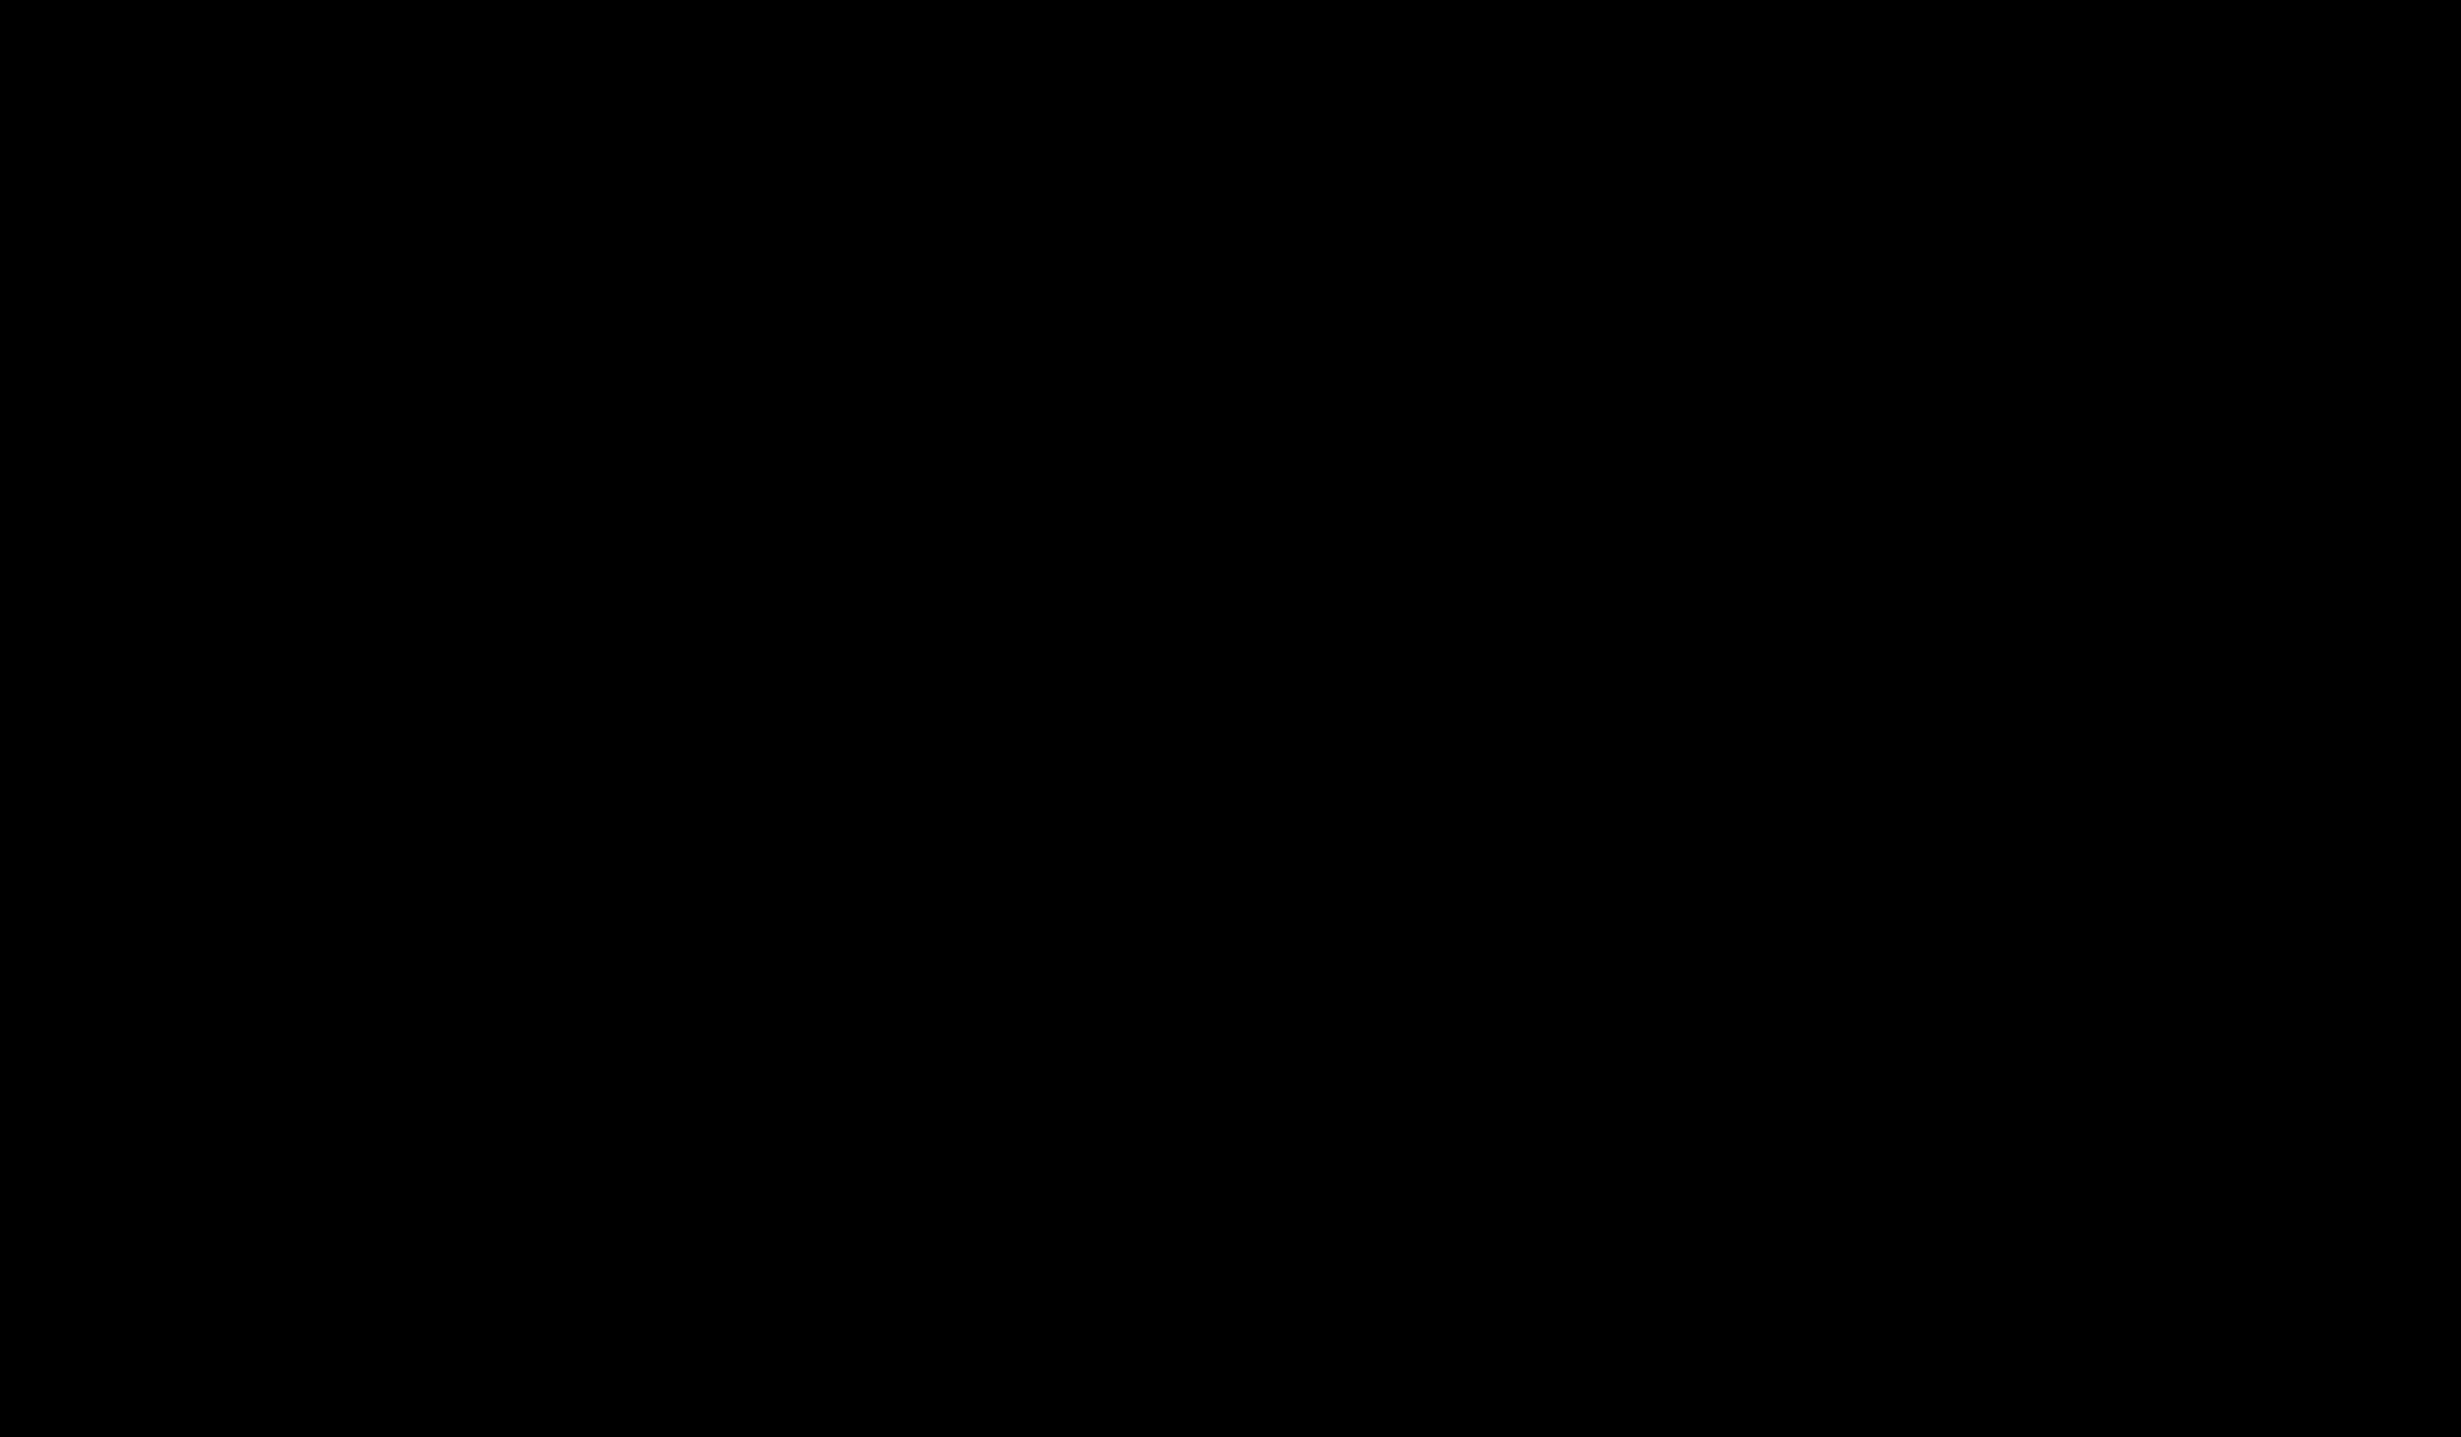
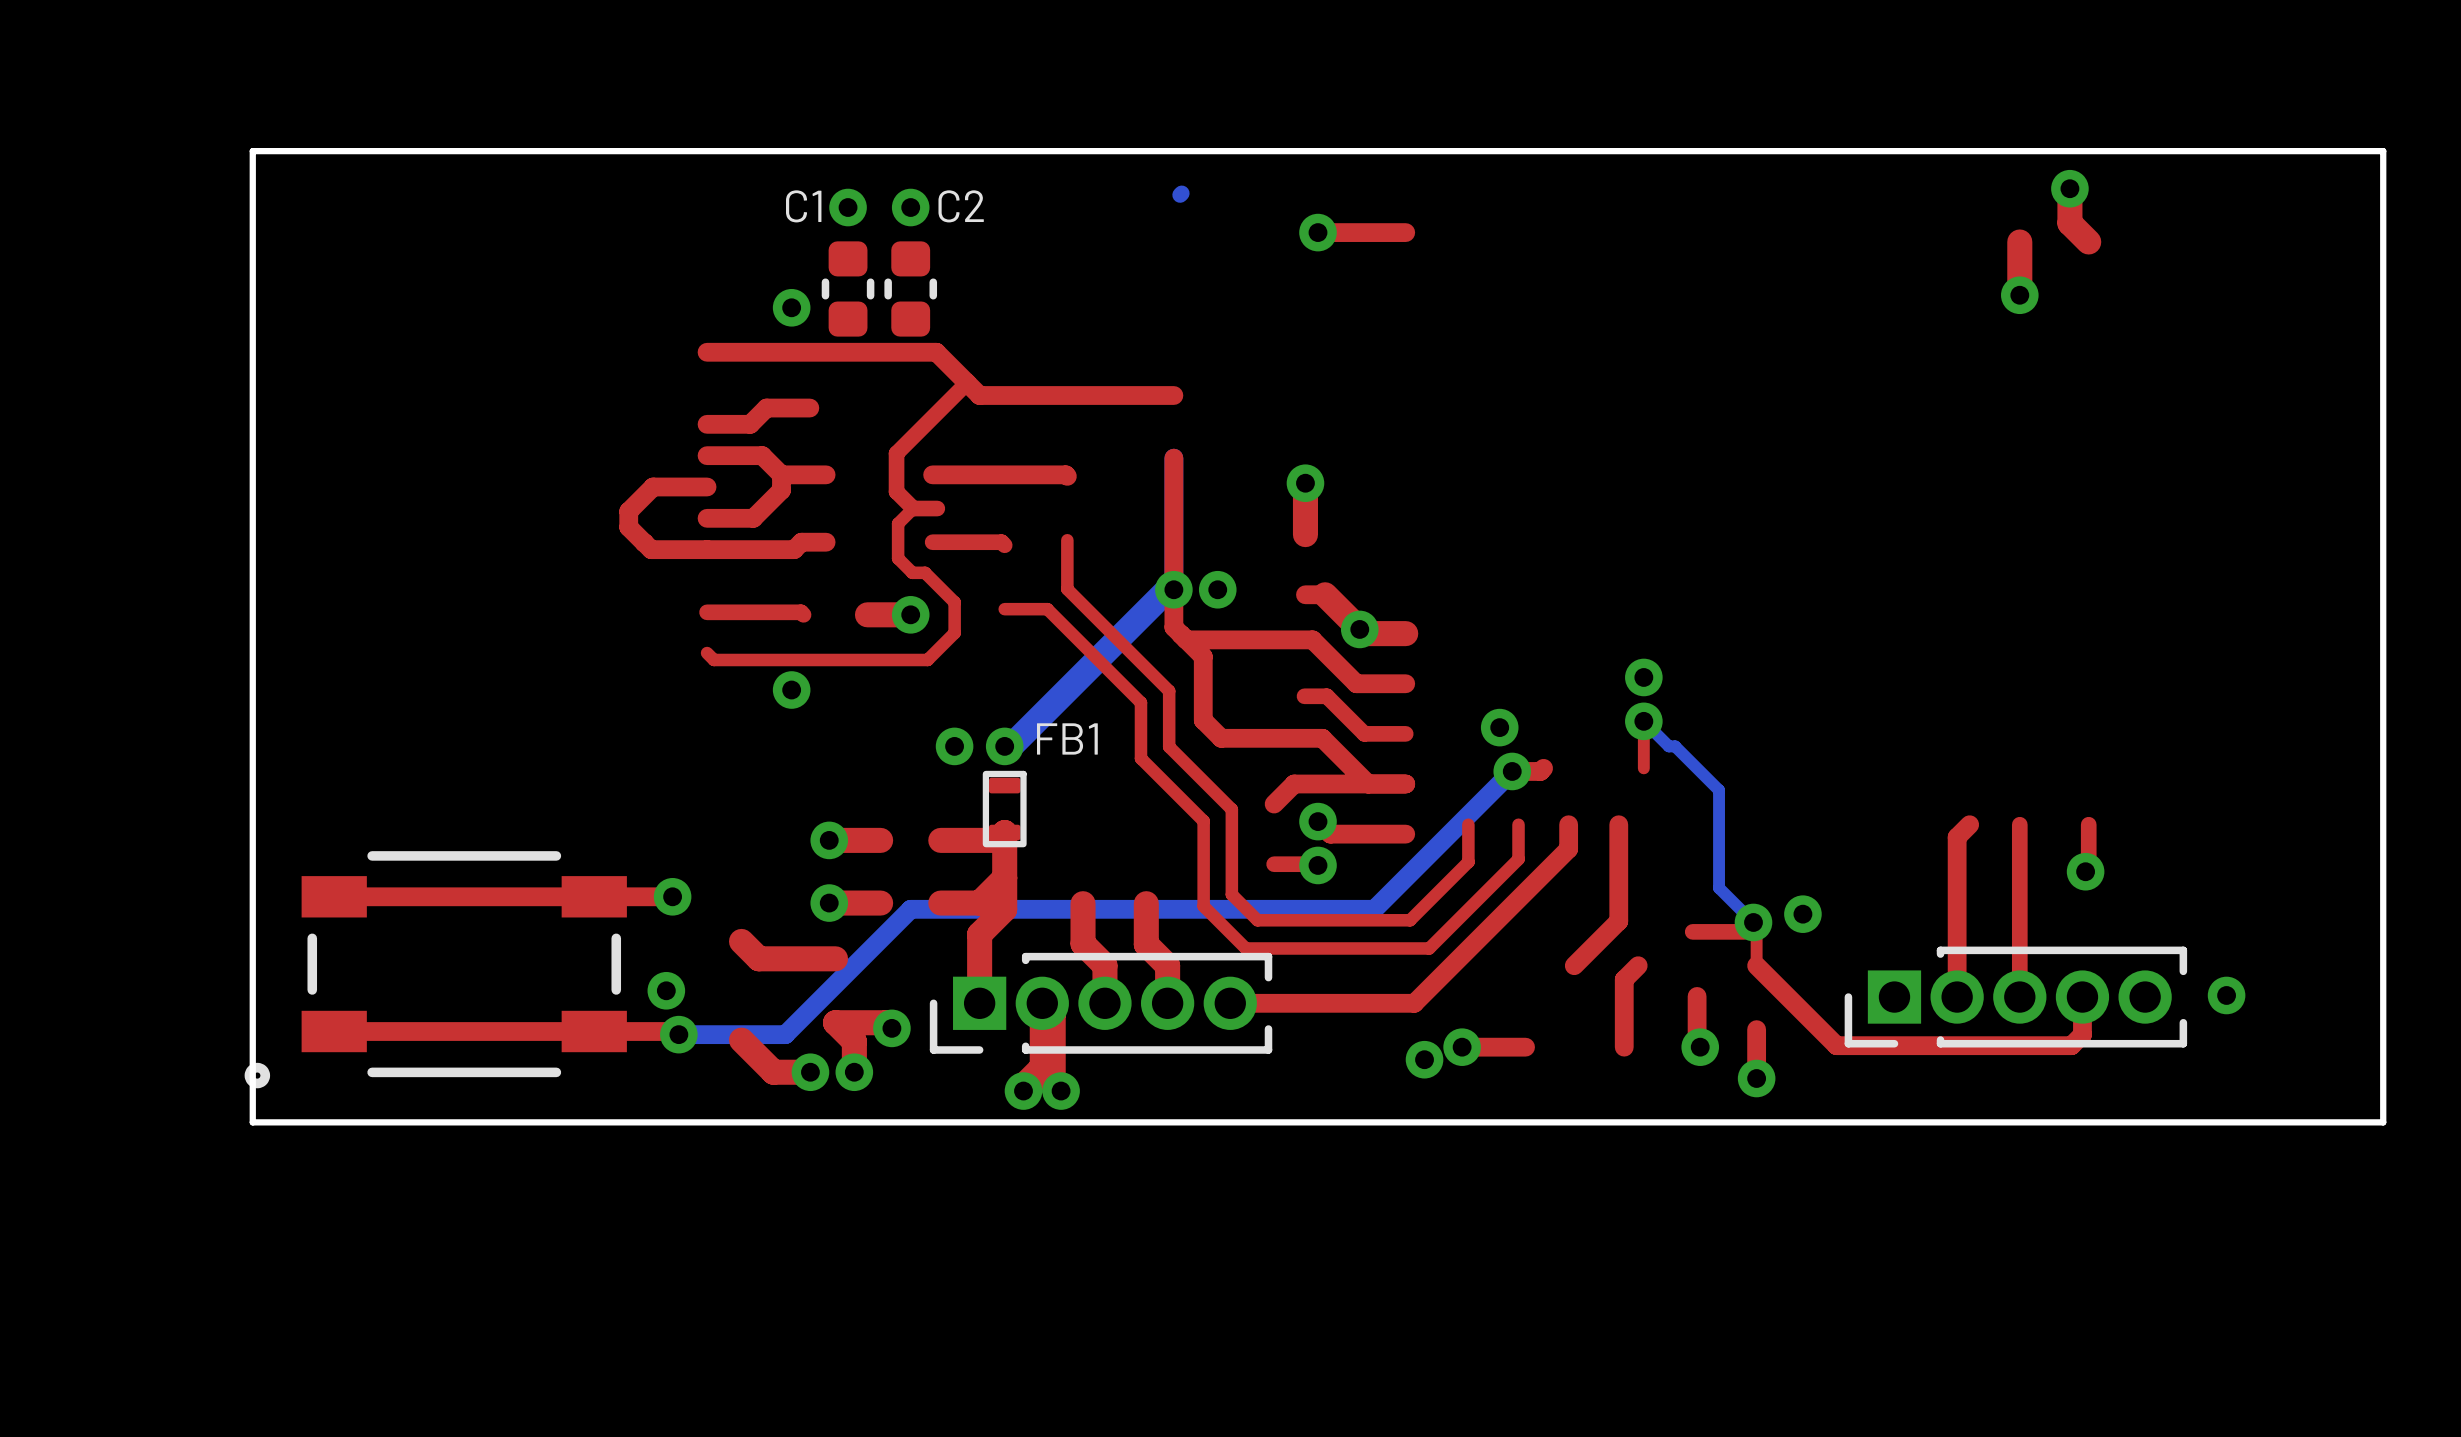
board edge: none -> (252, 151) (2383, 151) (2383, 1122) (252, 1122) (252, 151)
top track: none -> (2069, 188) (2069, 223) (2088, 241)
via: none -> (2069, 188)
bottom track: none -> (1181, 193) (1180, 194)
via: none -> (848, 207)
via: none -> (910, 207)
top track: none -> (1318, 232) (1405, 232)
via: none -> (1318, 232)
top track: none -> (2019, 241) (2019, 295)
C1: none -> (848, 288)
C2: none -> (910, 288)
via: none -> (2019, 295)
via: none -> (791, 307)
top track: none -> (707, 352) (936, 352) (979, 395) (1173, 395)
top track: none -> (967, 382) (896, 453) (896, 491) (913, 508)
top track: none -> (809, 408) (766, 408) (750, 424) (707, 424)
top track: none -> (707, 455) (762, 455) (781, 474)
top track: none -> (1173, 458) (1173, 627) (1203, 656) (1203, 720) (1221, 738) (1322, 738) (1368, 784)
bottom track: none -> (1173, 458) (1173, 583) (1010, 746) (1004, 746)
top track: none -> (781, 474) (826, 474)
top track: none -> (781, 474) (781, 490) (753, 518) (707, 518)
top track: none -> (932, 474) (1067, 476)
top track: none -> (1305, 483) (1305, 534)
via: none -> (1305, 483)
top track: none -> (707, 486) (653, 486) (628, 511) (628, 527) (651, 549) (794, 549) (801, 542) (826, 542)
top track: none -> (913, 508) (937, 508)
top track: none -> (913, 508) (898, 523) (898, 558) (912, 572) (925, 572) (954, 602) (954, 633) (927, 659) (714, 659) (707, 653)
top track: none -> (1067, 540) (1067, 589) (1169, 691) (1169, 746) (1231, 809) (1231, 894) (1257, 920) (1410, 920) (1468, 862) (1468, 824)
top track: none -> (932, 542) (1001, 542) (1004, 545)
via: none -> (1173, 589)
via: none -> (1217, 589)
top track: none -> (1305, 594) (1325, 594) (1363, 633) (1405, 633)
top track: none -> (1004, 609) (1047, 609) (1140, 702) (1140, 758) (1203, 821) (1203, 906) (1245, 948) (1429, 948) (1518, 859) (1518, 824)
top track: none -> (707, 612) (801, 612) (803, 614)
top track: none -> (867, 614) (910, 614)
via: none -> (910, 614)
via: none -> (1359, 629)
top track: none -> (1186, 639) (1312, 639) (1356, 683) (1405, 683)
via: none -> (1643, 677)
via: none -> (791, 690)
top track: none -> (1304, 696) (1326, 696) (1364, 733) (1405, 733)
top track: none -> (1643, 721) (1643, 768)
bottom track: none -> (1643, 721) (1668, 746) (1675, 746) (1719, 790) (1719, 888) (1753, 922)
via: none -> (1643, 721)
via: none -> (1499, 727)
via: none -> (954, 746)
via: none -> (1004, 746)
top track: none -> (1543, 768) (1540, 771) (1512, 771)
bottom track: none -> (1512, 771) (1374, 909) (910, 909) (785, 1034) (678, 1034)
via: none -> (1512, 771)
top track: none -> (1405, 784) (1294, 784) (1274, 804)
FB1: none -> (1004, 809)
top track: none -> (1318, 821) (1330, 834) (1405, 834)
via: none -> (1318, 821)
top track: none -> (1568, 824) (1568, 849) (1414, 1003) (1230, 1003)
top track: none -> (1618, 824) (1618, 921) (1574, 965)
top track: none -> (1969, 824) (1957, 837) (1957, 997)
top track: none -> (2019, 824) (2019, 997)
top track: none -> (2088, 824) (2088, 868) (2085, 871)
top track: none -> (829, 840) (880, 840)
via: none -> (829, 840)
top track: none -> (940, 840) (996, 840) (1004, 832) (1004, 909) (979, 934) (979, 1003)
top track: none -> (1274, 864) (1318, 865)
via: none -> (1318, 865)
via: none -> (2085, 871)
top track: none -> (1004, 877) (979, 903) (940, 903)
top track: none -> (334, 896) (672, 896)
via: none -> (672, 896)
top track: none -> (829, 903) (880, 903)
via: none -> (829, 903)
top track: none -> (1083, 903) (1083, 943) (1104, 965) (1104, 1003)
top track: none -> (1146, 903) (1146, 944) (1167, 965) (1167, 1003)
via: none -> (1802, 914)
via: none -> (1753, 922)
top track: none -> (1756, 925) (1756, 965) (1836, 1045) (2071, 1045) (2082, 1034) (2082, 997)
top track: none -> (1692, 931) (1744, 931)
top track: none -> (741, 941) (758, 958) (835, 958)
top track: none -> (1638, 965) (1624, 979) (1624, 1047)
part: none -> (435, 969)
via: none -> (666, 990)
via: none -> (2226, 995)
top track: none -> (1697, 996) (1697, 1044) (1700, 1047)
part: none -> (2015, 997)
part: none -> (1101, 1003)
top track: none -> (891, 1028) (886, 1022) (835, 1022) (854, 1041) (854, 1072)
via: none -> (891, 1028)
top track: none -> (1756, 1029) (1756, 1078)
top track: none -> (334, 1031) (675, 1031) (678, 1034)
via: none -> (678, 1034)
top track: none -> (741, 1040) (773, 1072) (810, 1072)
top track: none -> (1462, 1047) (1525, 1047)
via: none -> (1462, 1047)
via: none -> (1700, 1047)
via: none -> (1424, 1059)
via: none -> (810, 1072)
via: none -> (854, 1072)
via: none -> (1756, 1078)
top track: none -> (1023, 1085) (1042, 1067) (1042, 1003) (1053, 1014) (1053, 1083) (1055, 1085) (1061, 1085)
via: none -> (1023, 1091)
via: none -> (1061, 1091)

